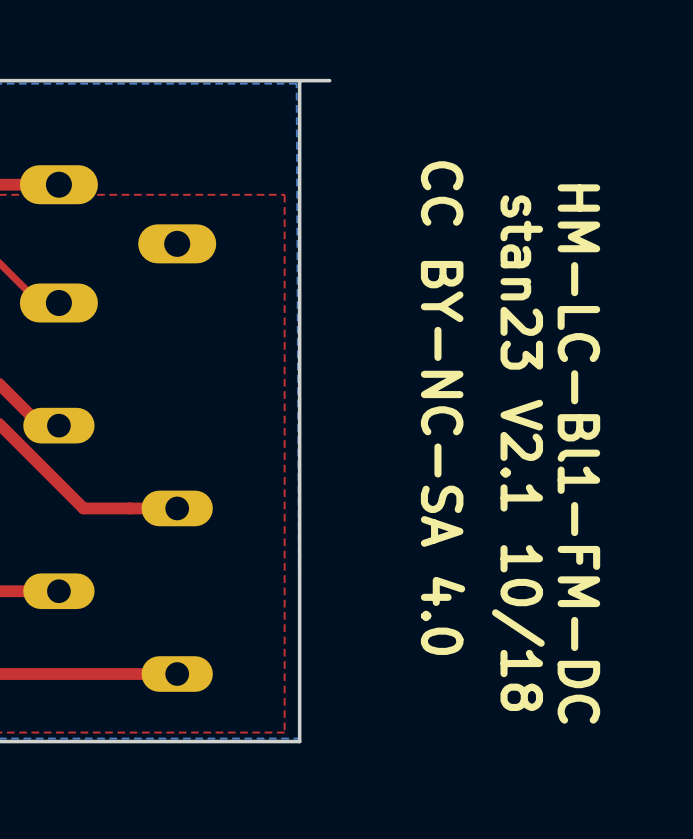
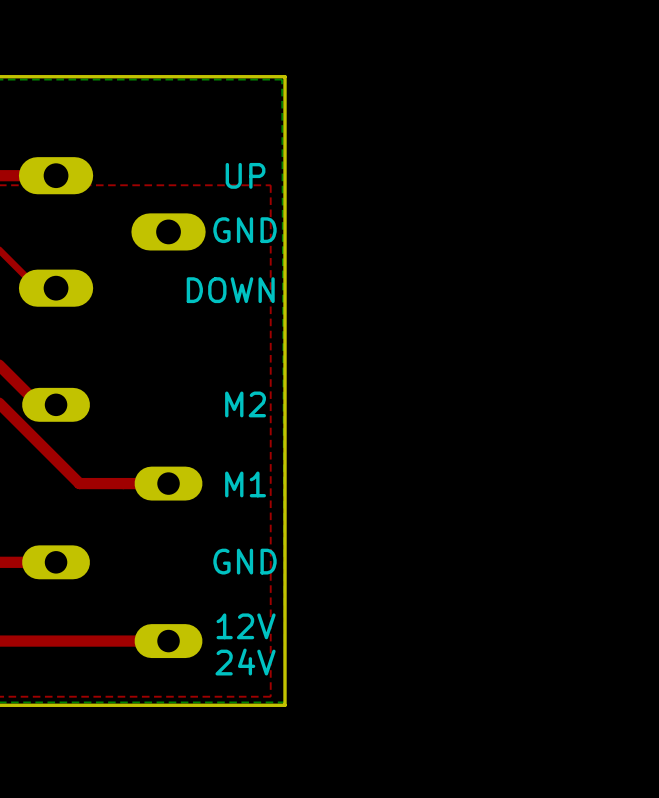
board edge: (329, 80) (299, 80) -> none
text: none -> UP (245, 175)
text: none -> GND (245, 230)
text: none -> DOWN (230, 290)
text: CC BY-NC-SA 4.0 (443, 408) -> none
text: none -> M2 (245, 404)
text: stan23 V2.1 10/18 (518, 453) -> none
text: HM-LC-Bl1-FM-DC (578, 454) -> none
text: none -> M1 (245, 484)
text: none -> GND (245, 561)
text: none -> 12V (246, 626)
text: none -> 24V (245, 662)

